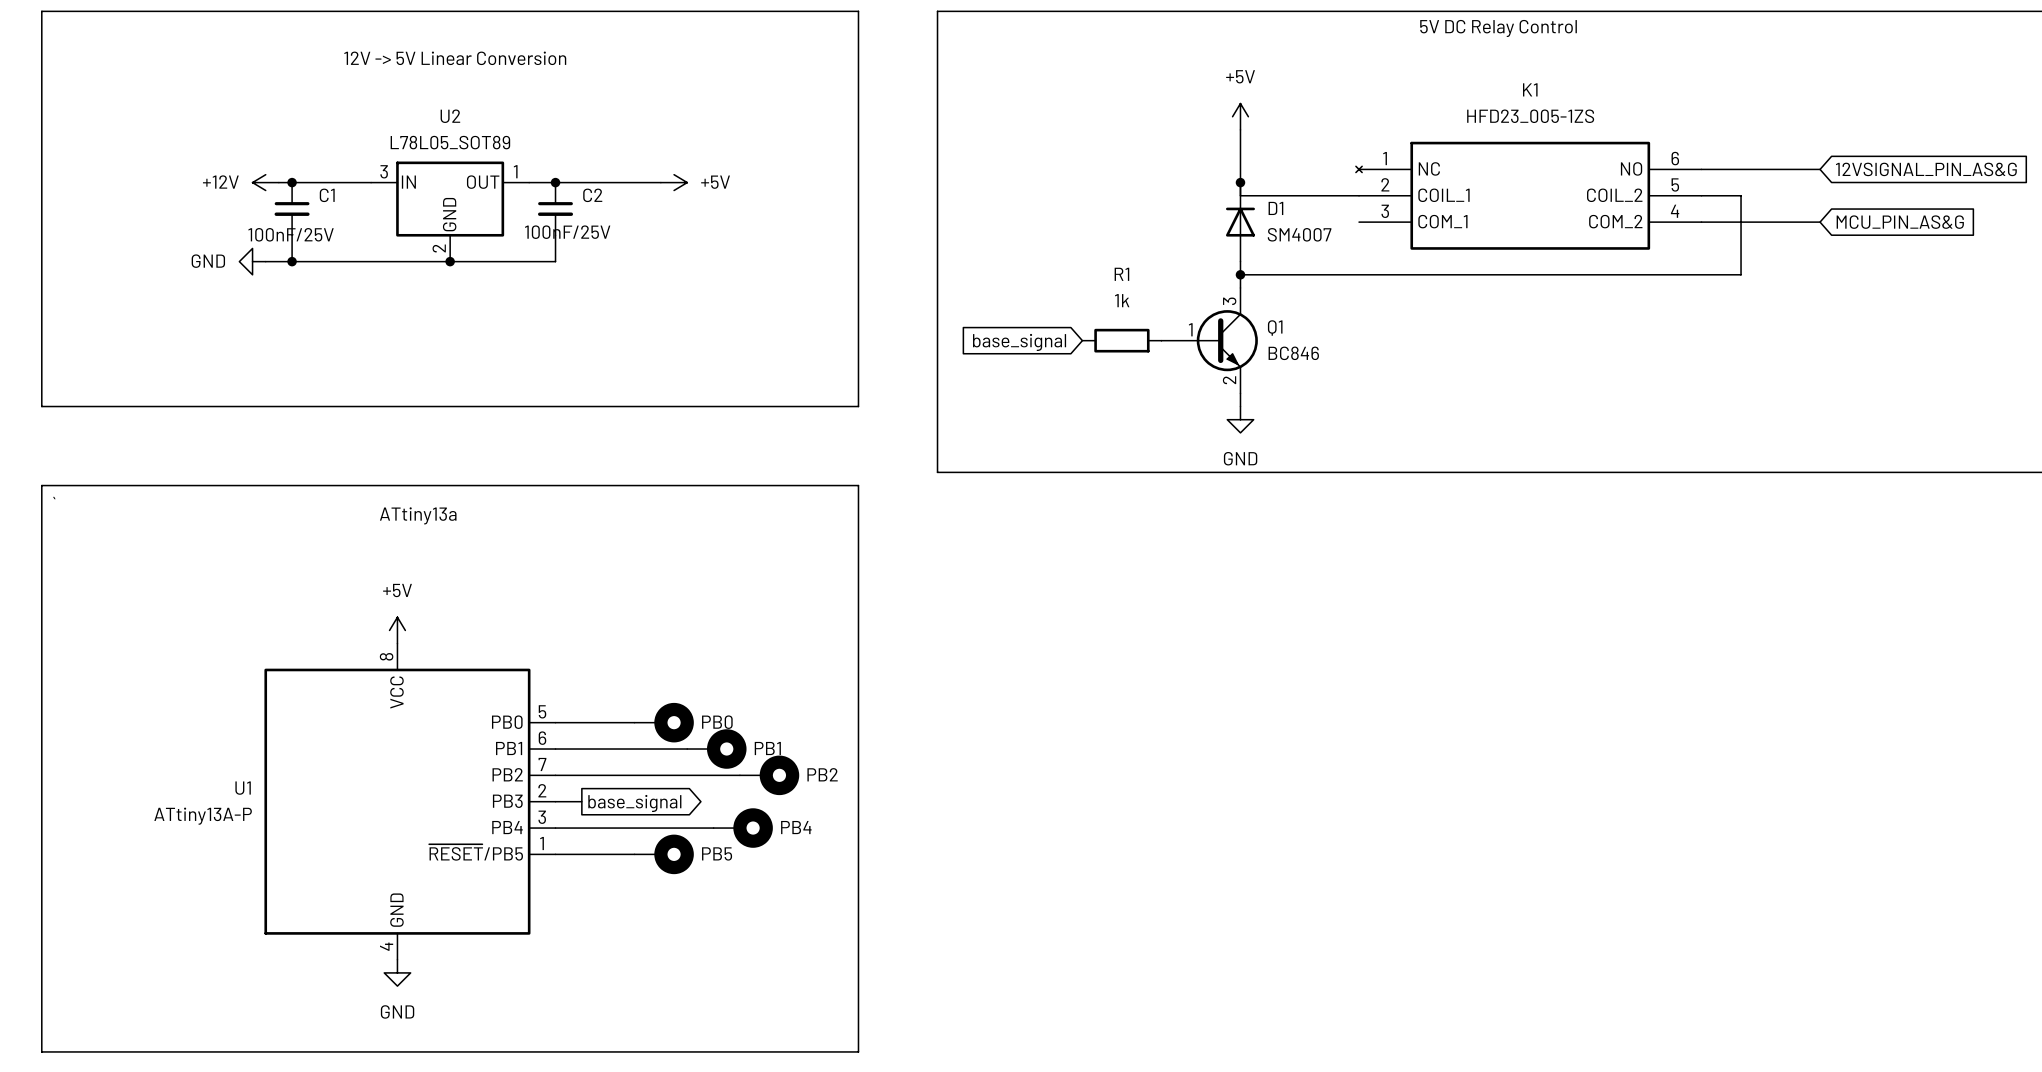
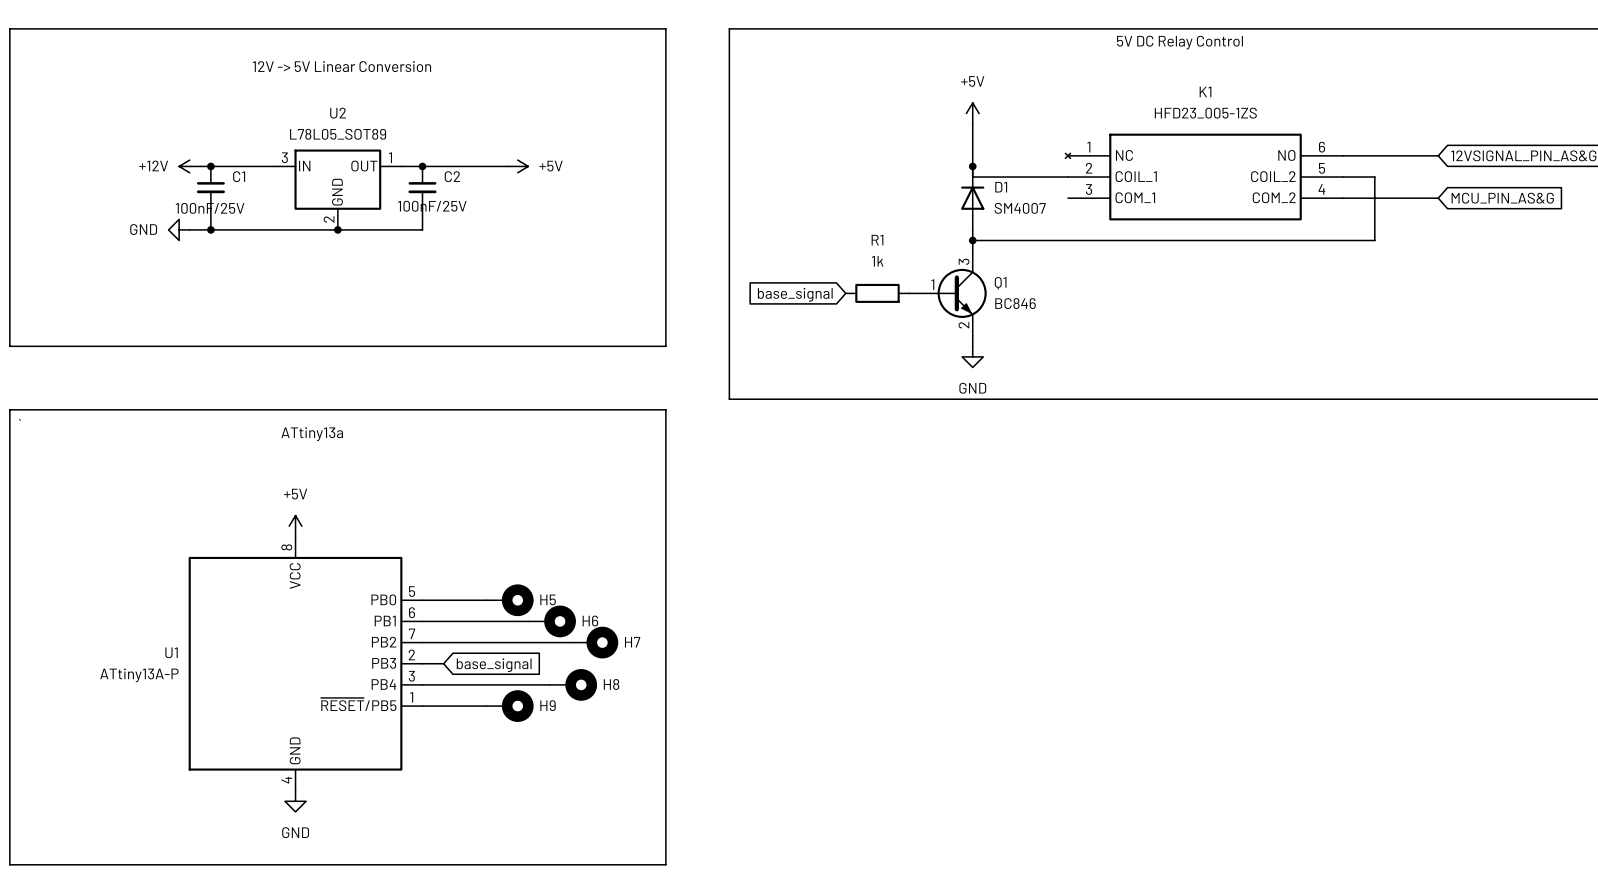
PB0 name: PB0 (717, 722) -> H5 (548, 599)
PB1 name: PB1 (767, 748) -> H6 (590, 621)
PB2 name: PB2 (822, 774) -> H7 (632, 642)
global label shape: output (634, 803) -> input (494, 665)
PB4 name: PB4 (796, 827) -> H8 (611, 684)
PB5 name: PB5 (717, 853) -> H9 (548, 705)

